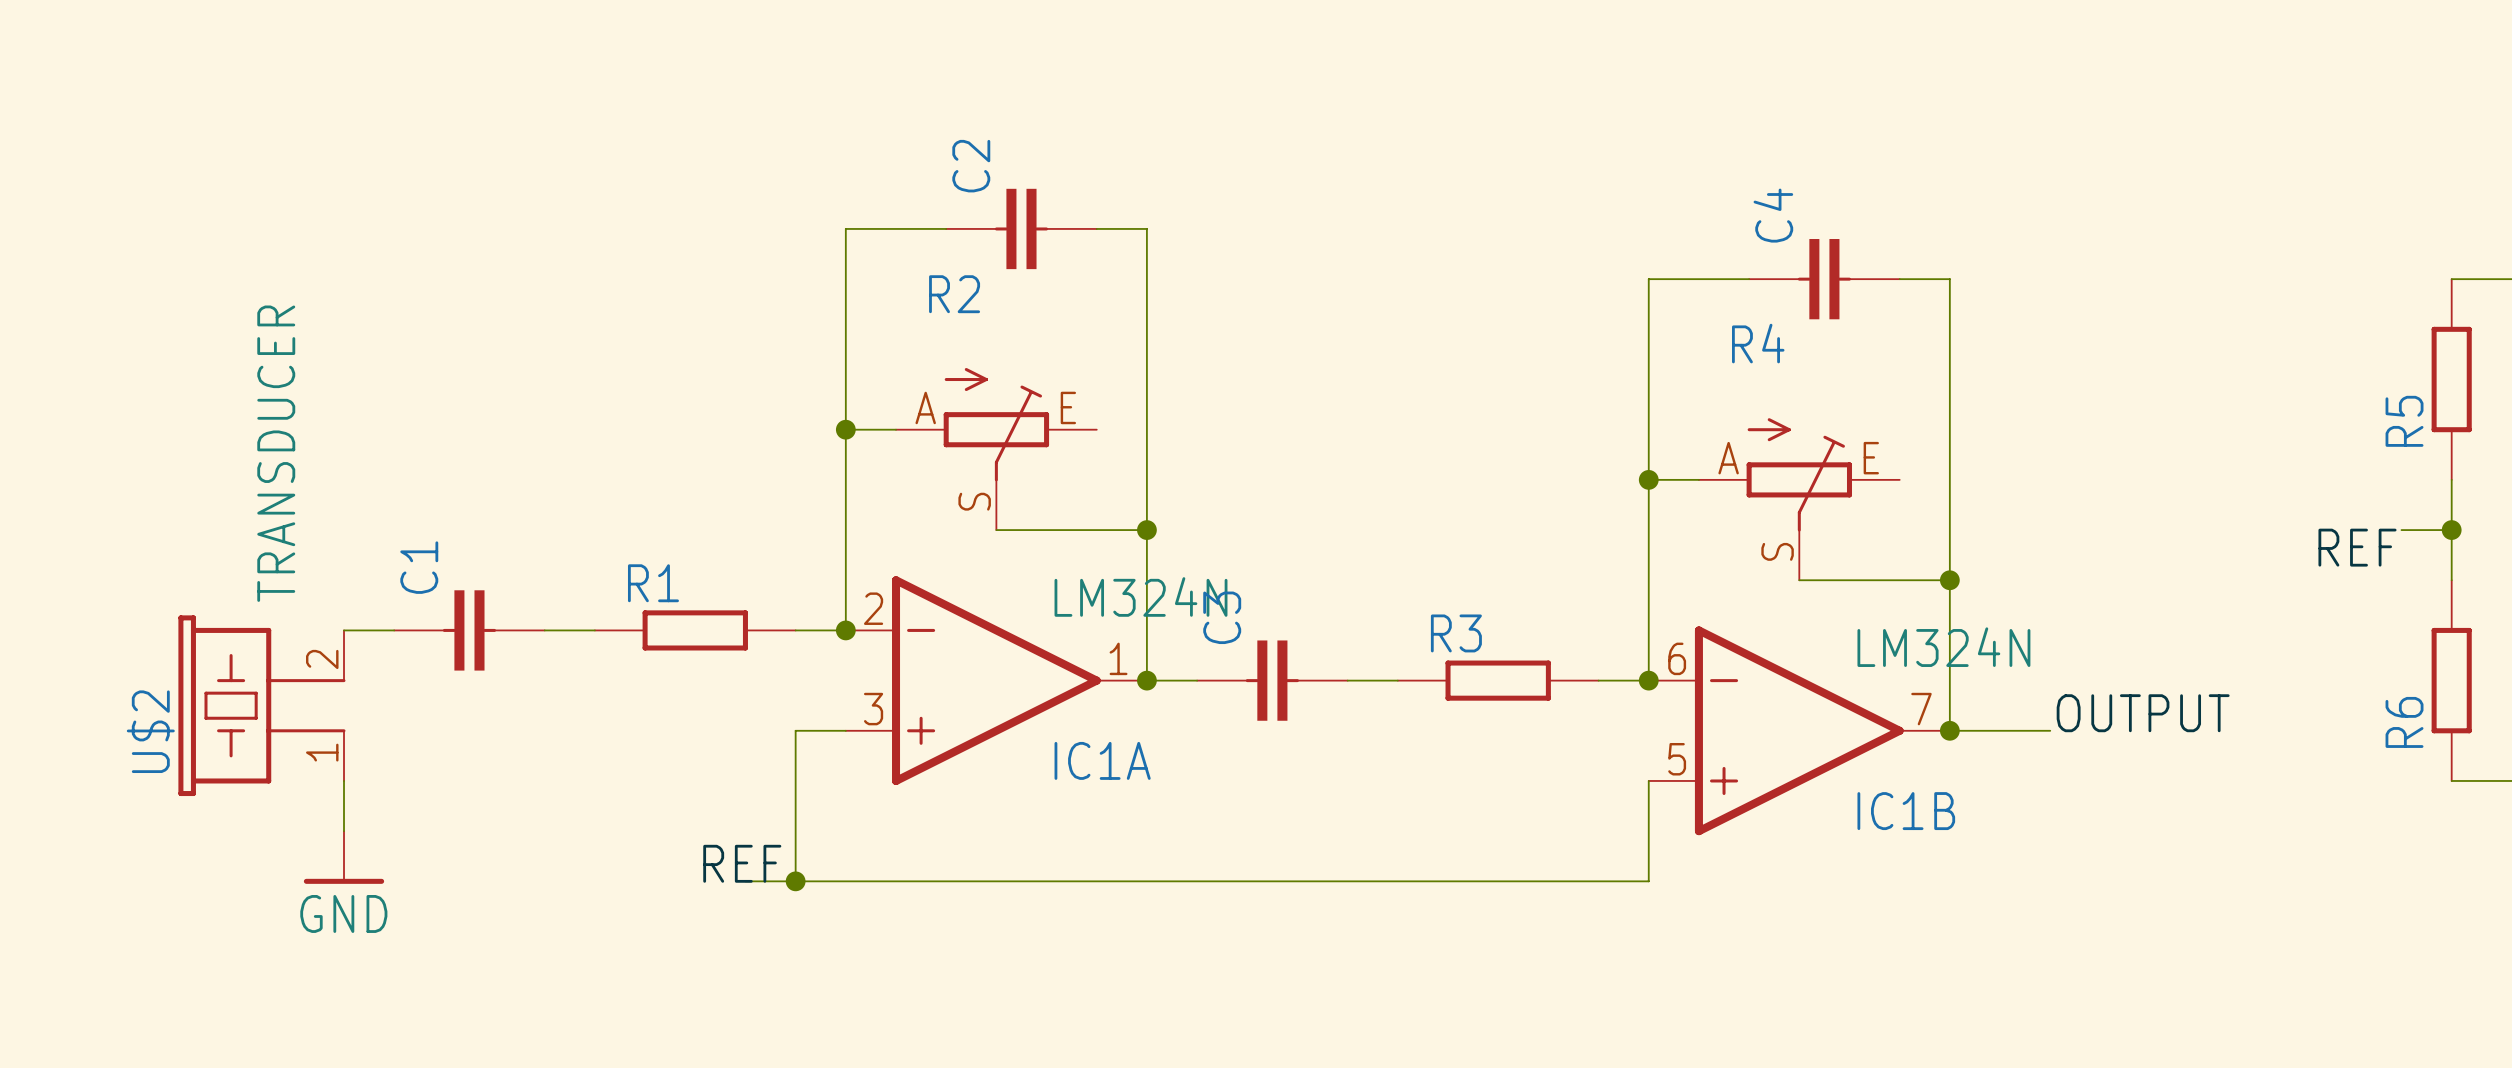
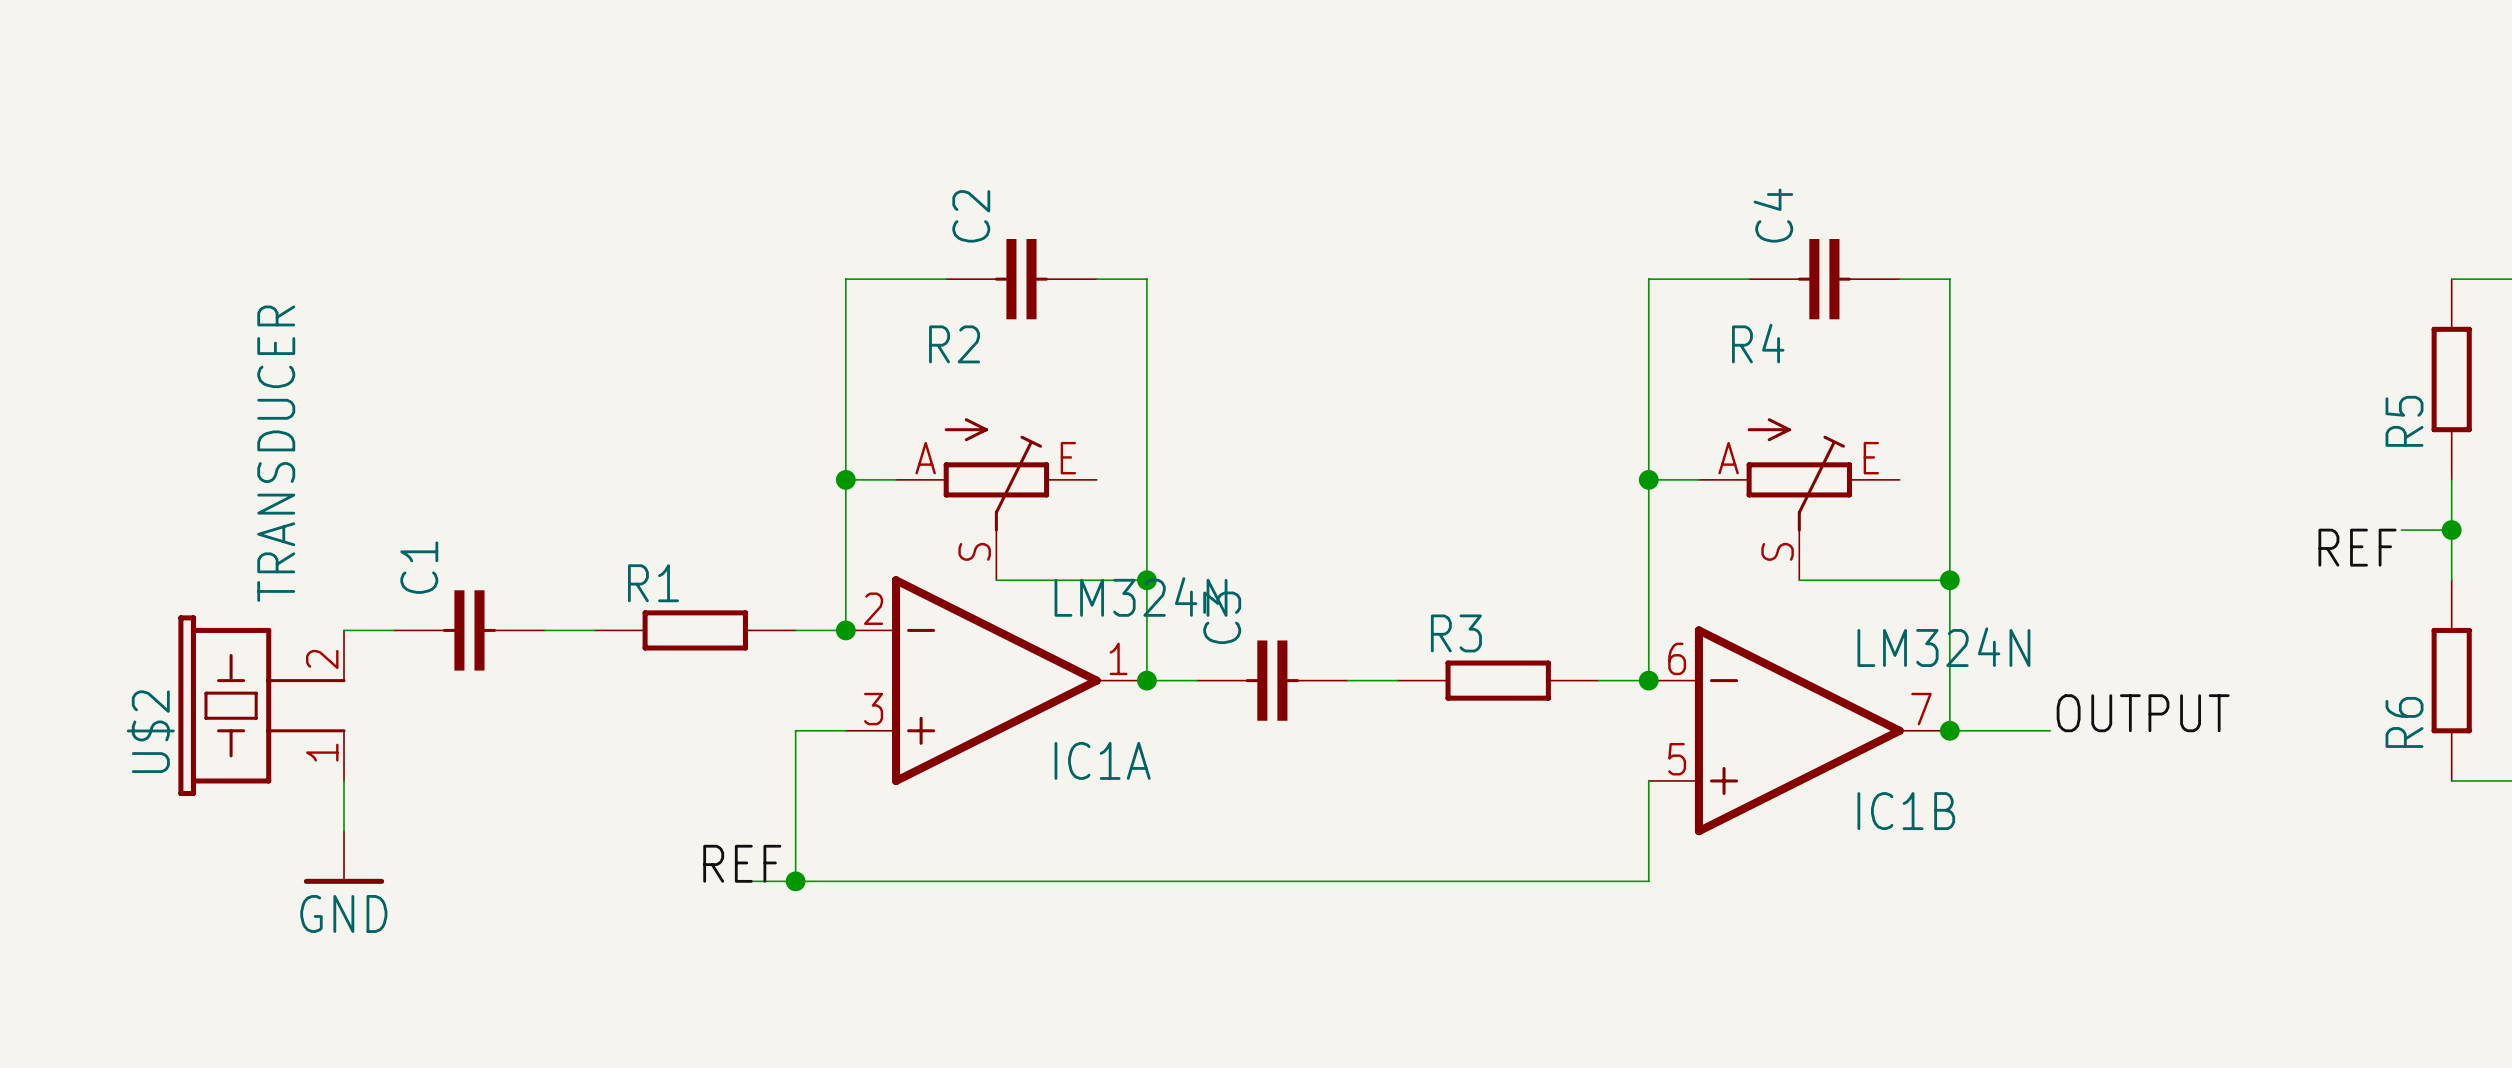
wire: (946, 228) (845, 228) (845, 279) -> (946, 279) (845, 279)
C2 position: (1021, 228) -> (1021, 279)
wire: (1096, 228) (1146, 228) (1146, 279) -> (1096, 279) (1146, 279)
wire: (845, 429) (896, 429) -> (845, 479) (896, 479)
junction position: (845, 429) -> (845, 479)
R2 position: (996, 449) -> (996, 499)
wire: (996, 530) (1146, 530) -> (996, 580) (1146, 580)
junction position: (1146, 530) -> (1146, 580)

